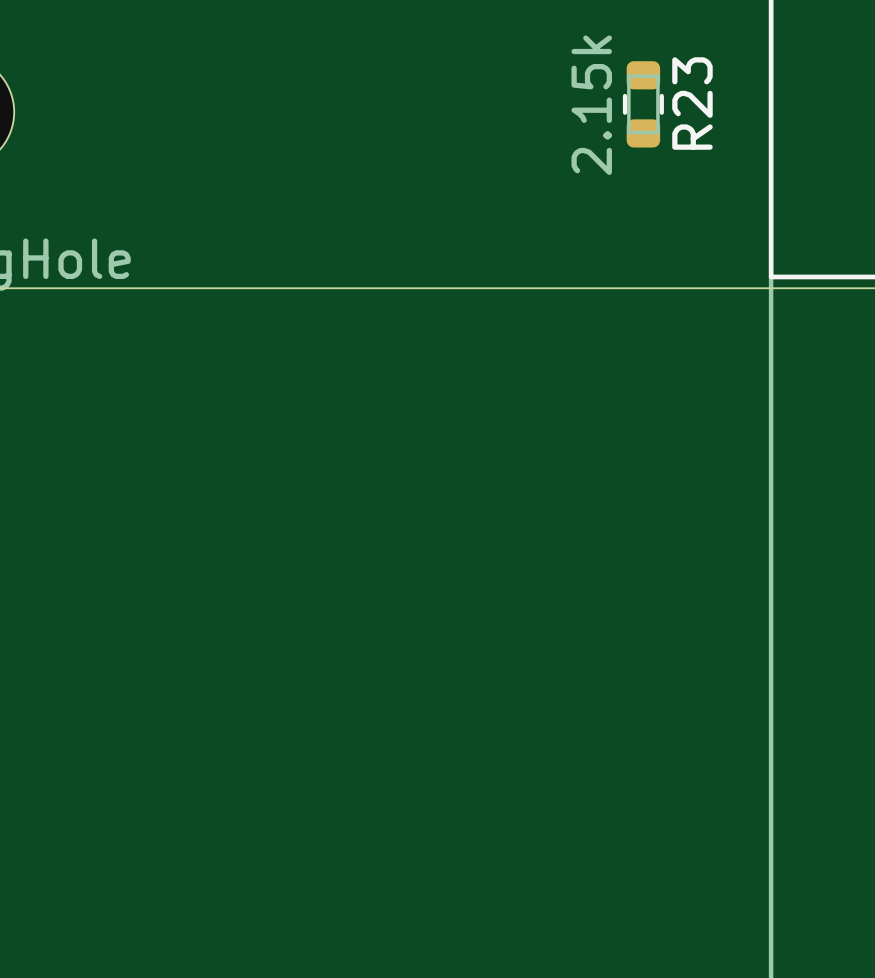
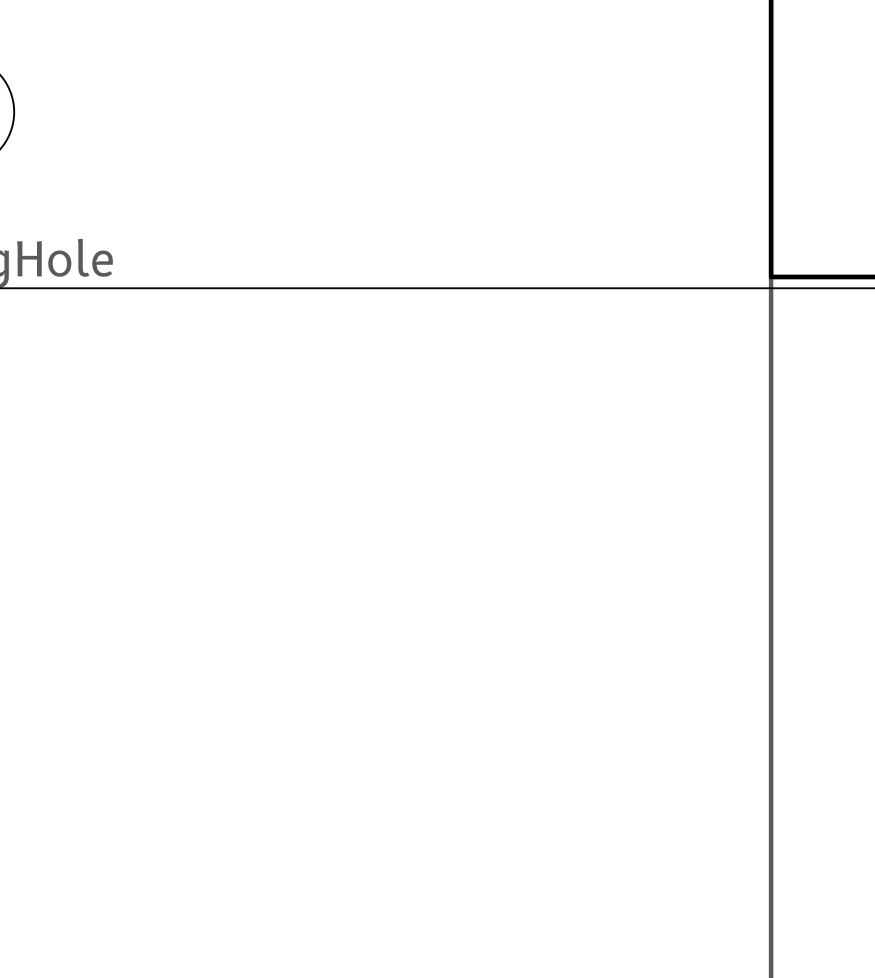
R23: 2.15k (643, 104) -> none

